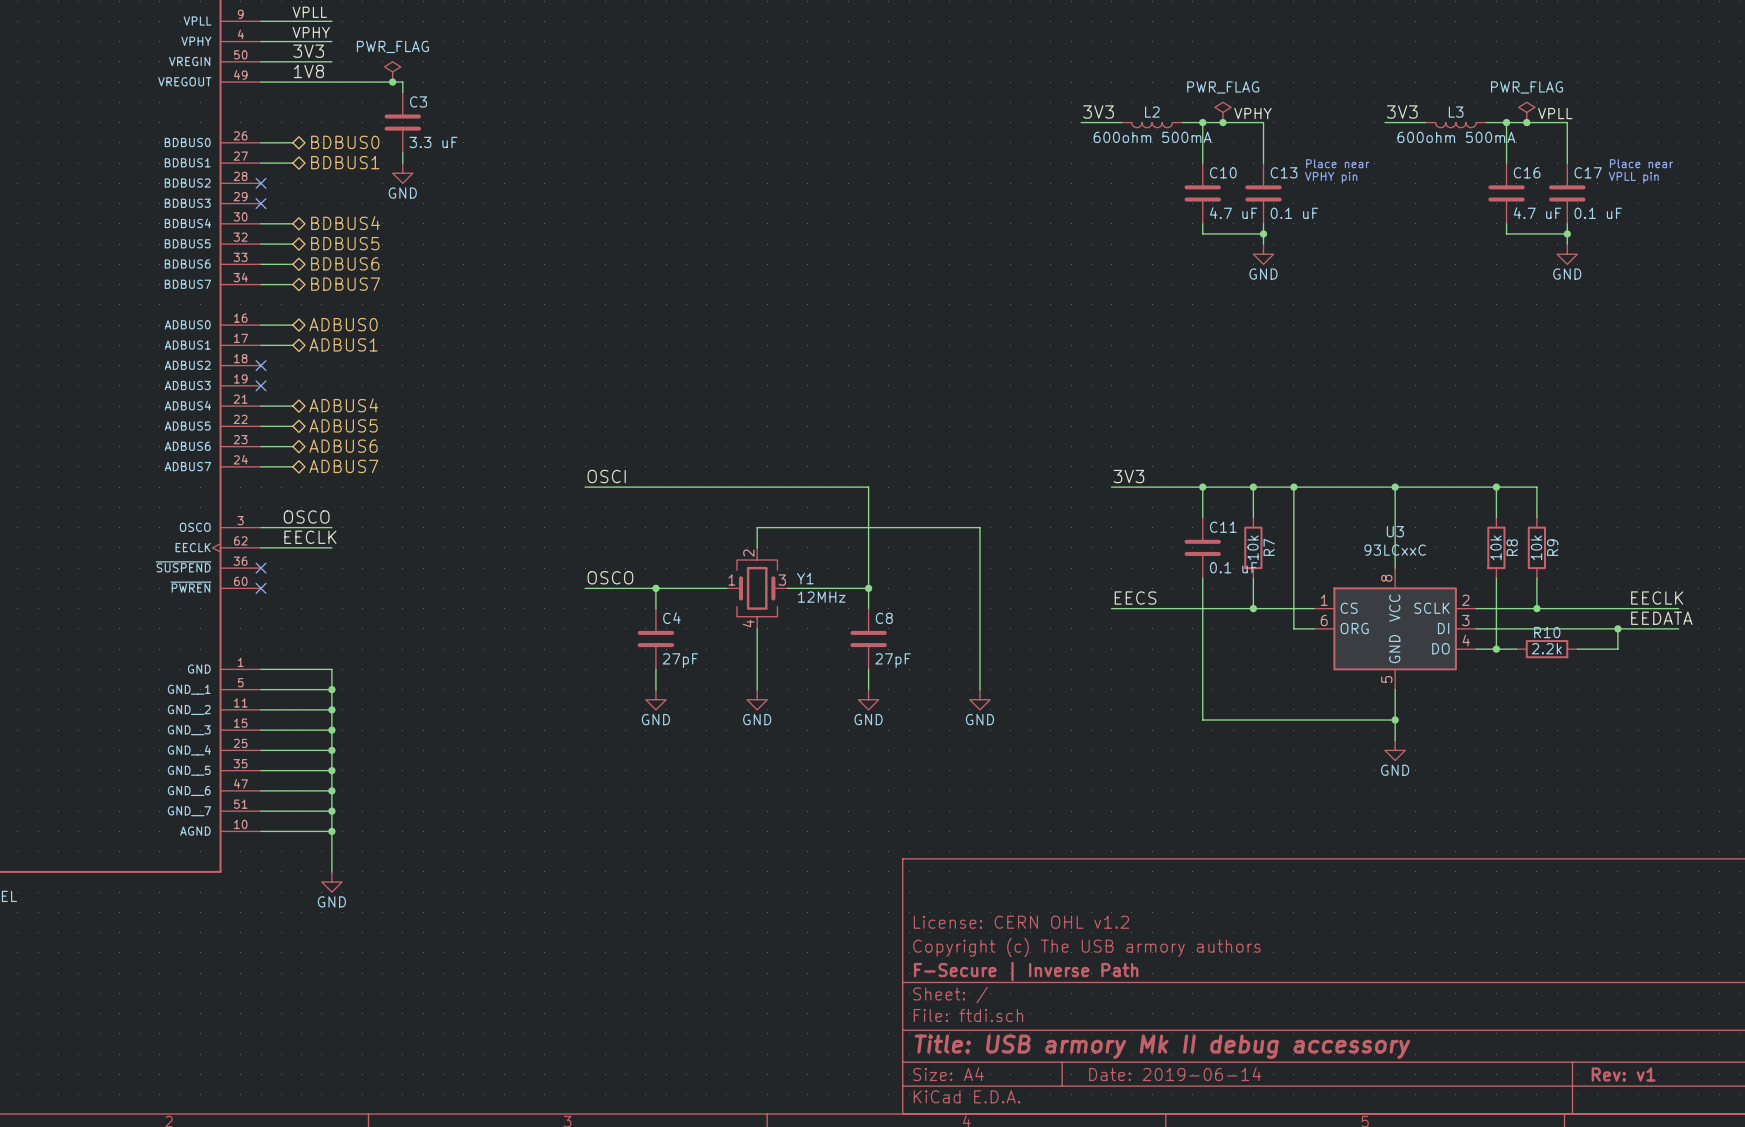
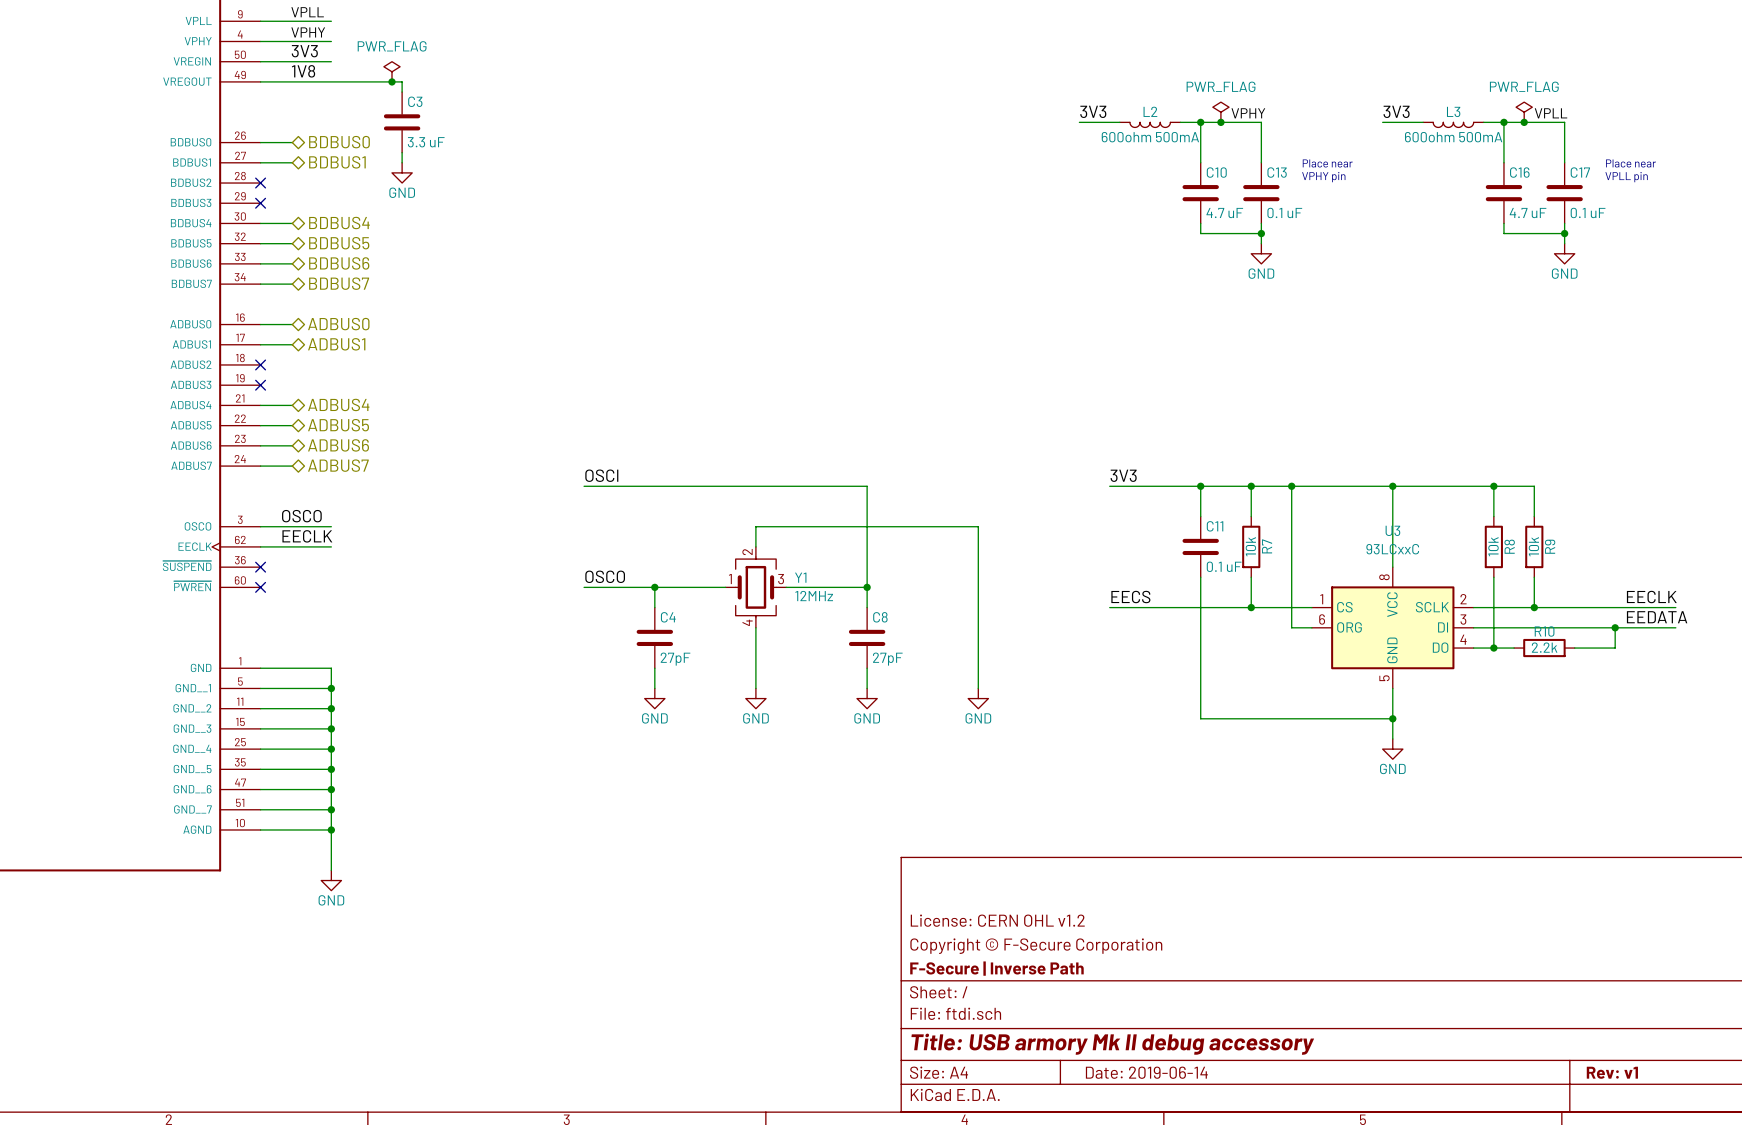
title block: Copyright (c) The USB armory authors (1086, 947) -> Copyright © F-Secure Corporation (1036, 946)

